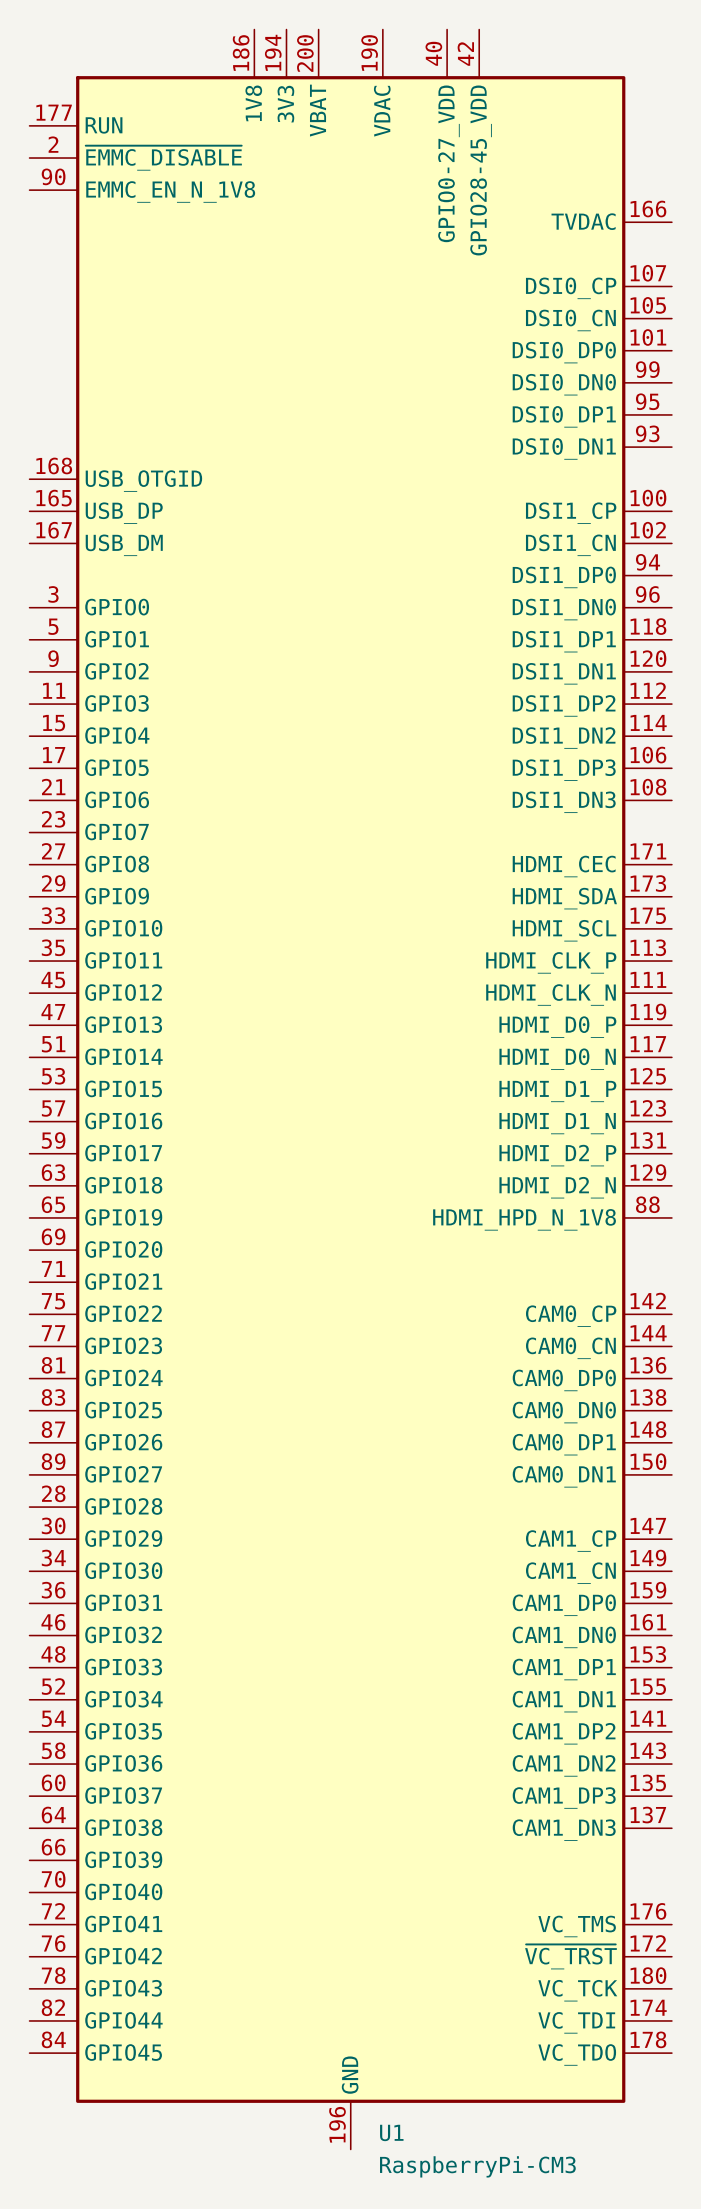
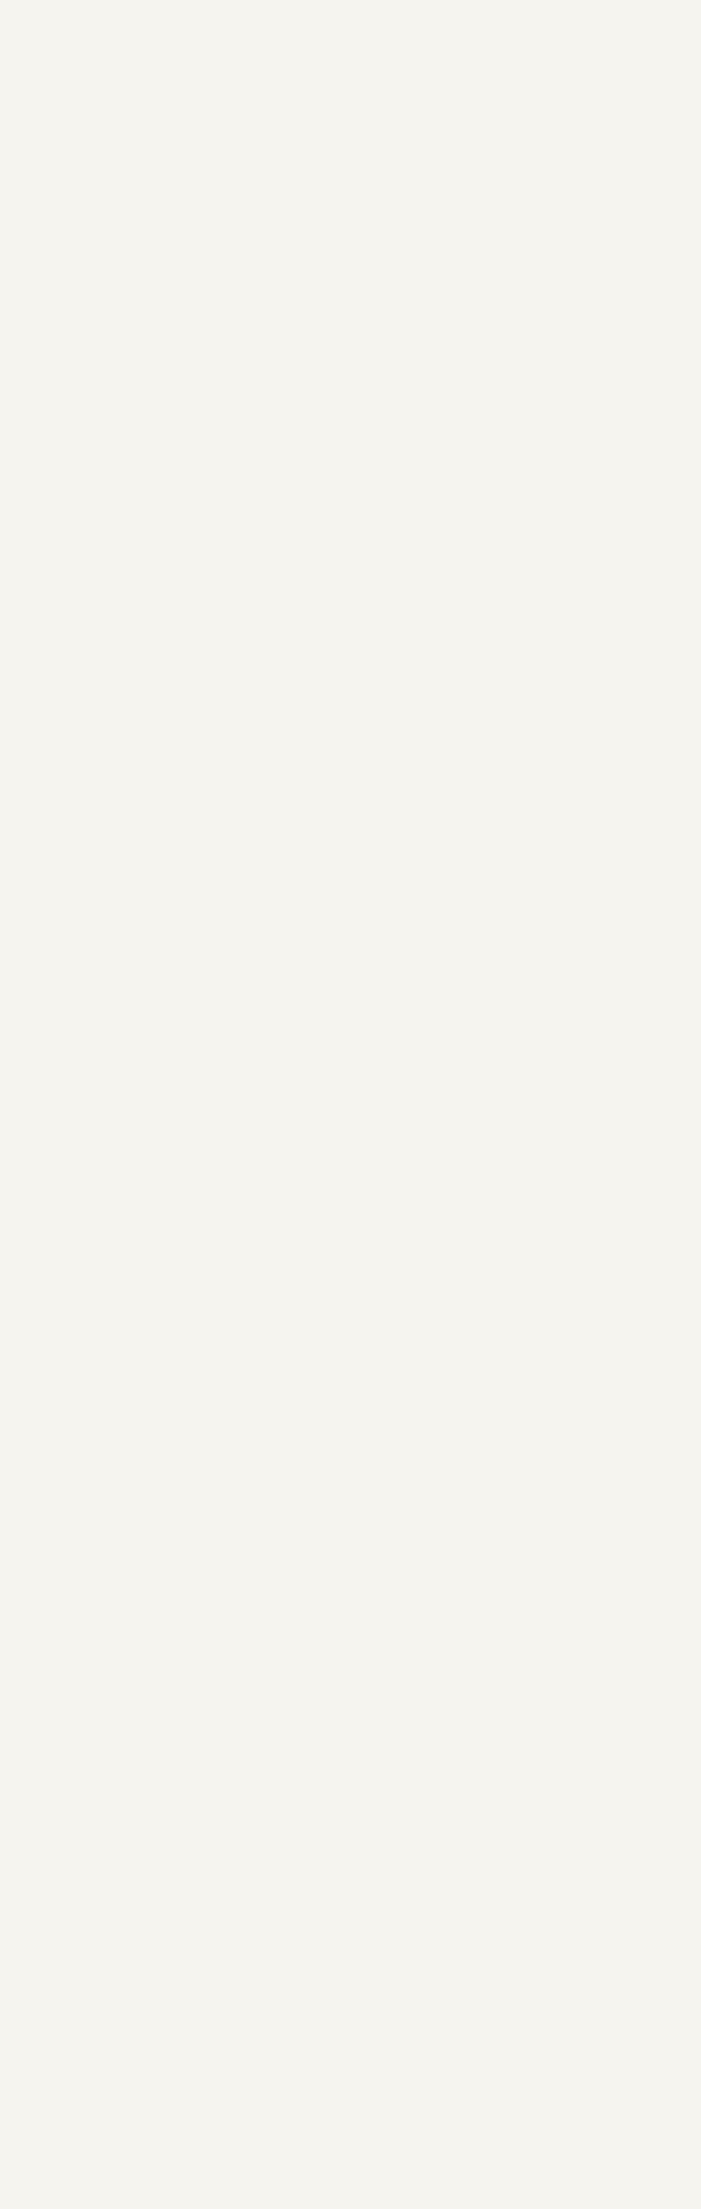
U1: RaspberryPi-CM3 (350, 1089) -> none

